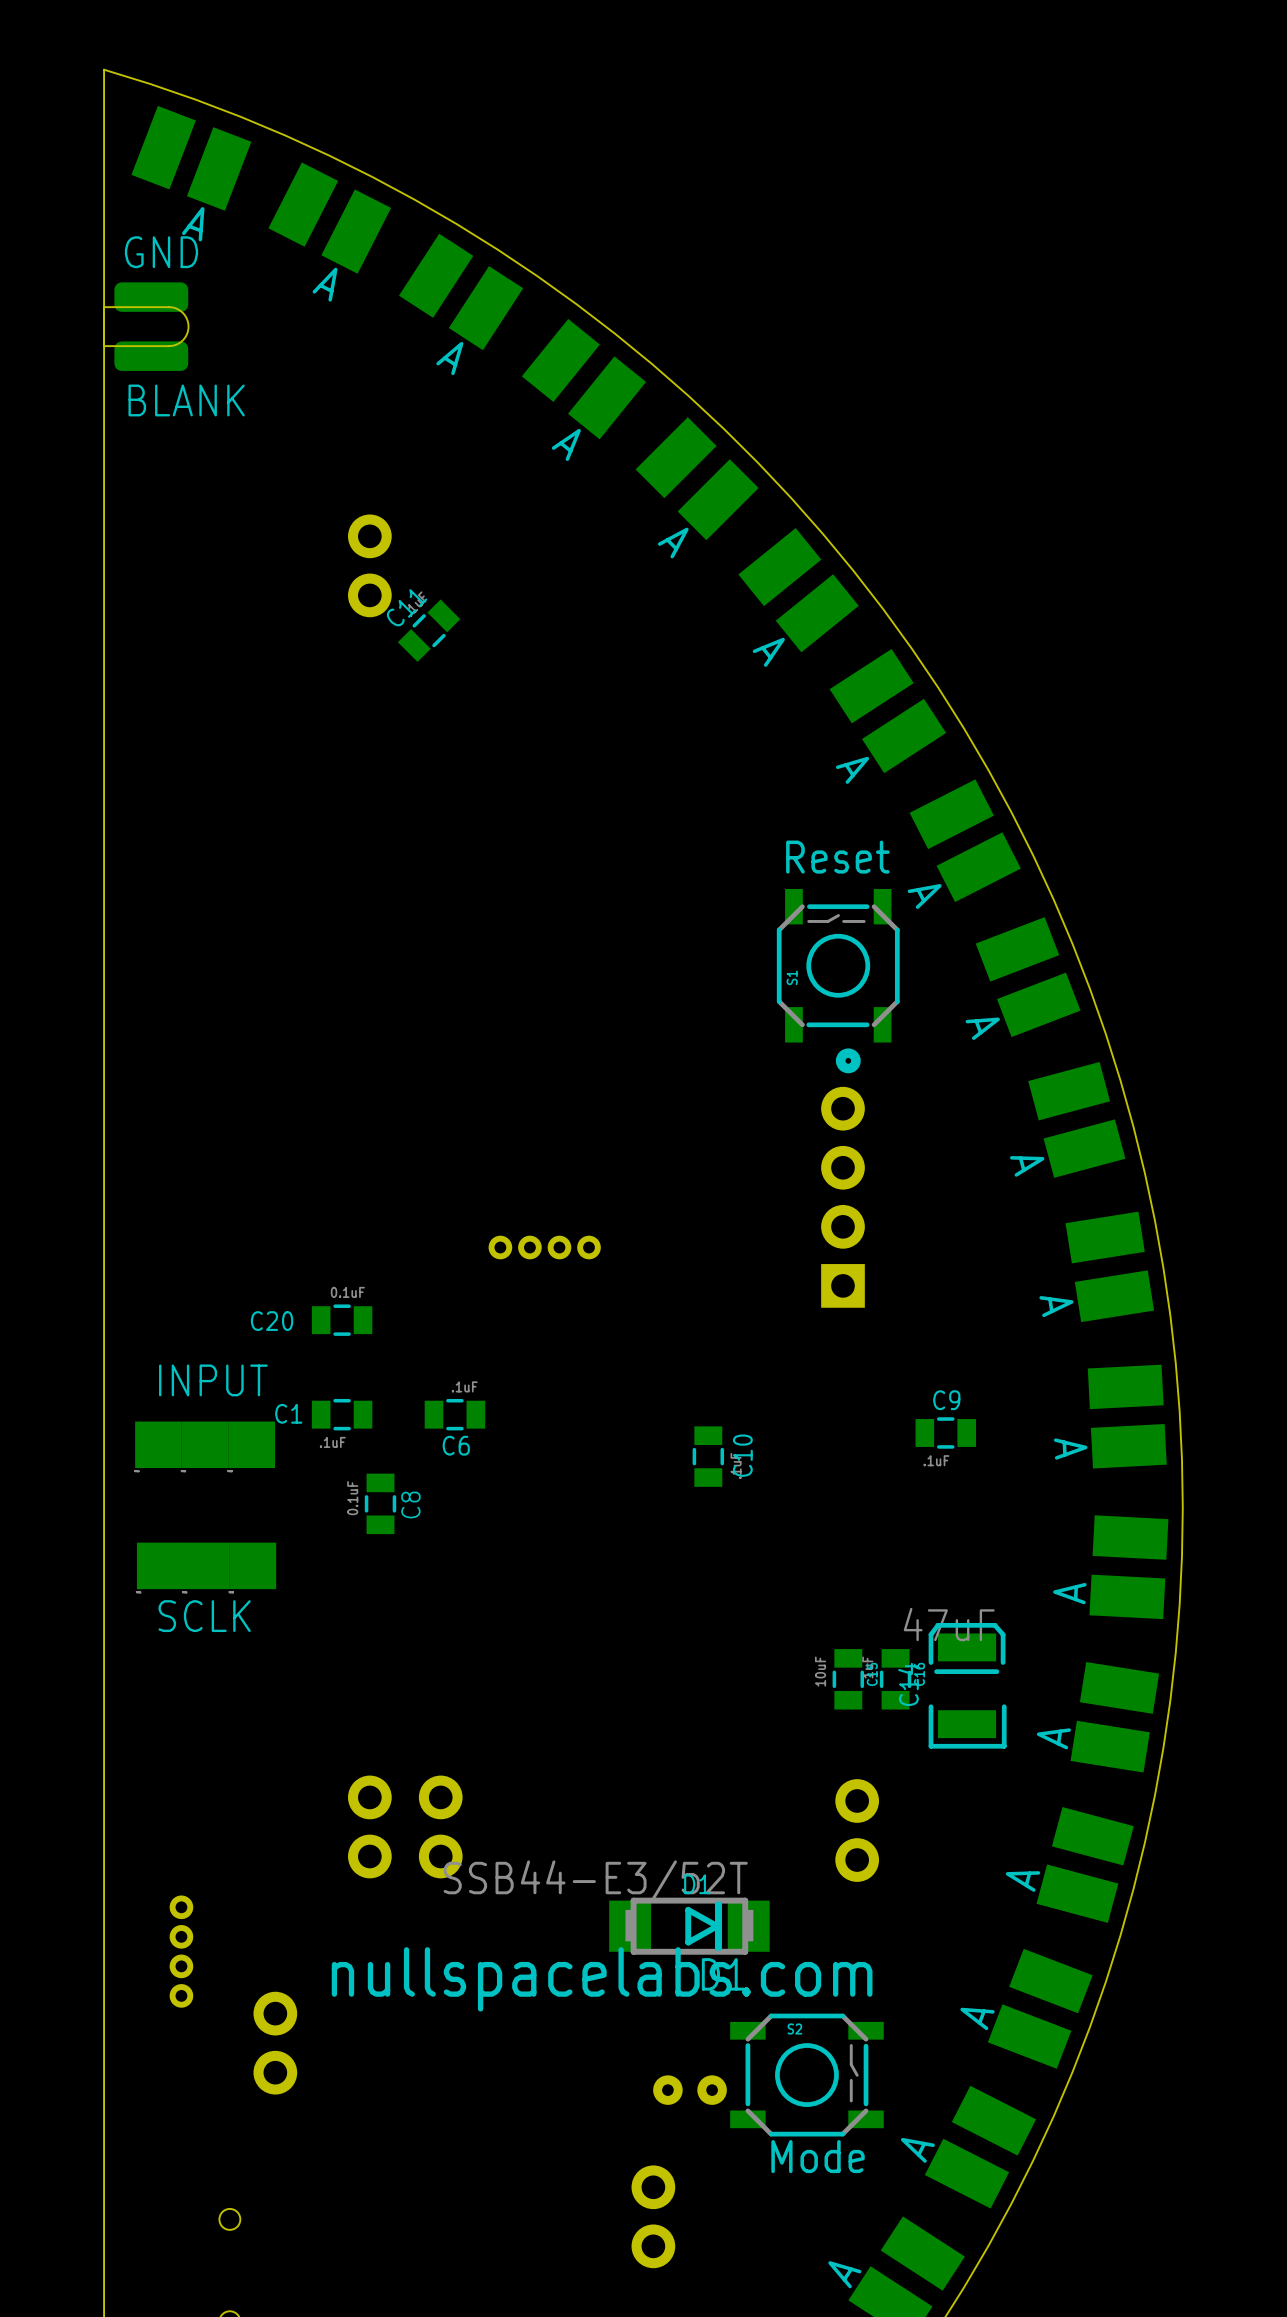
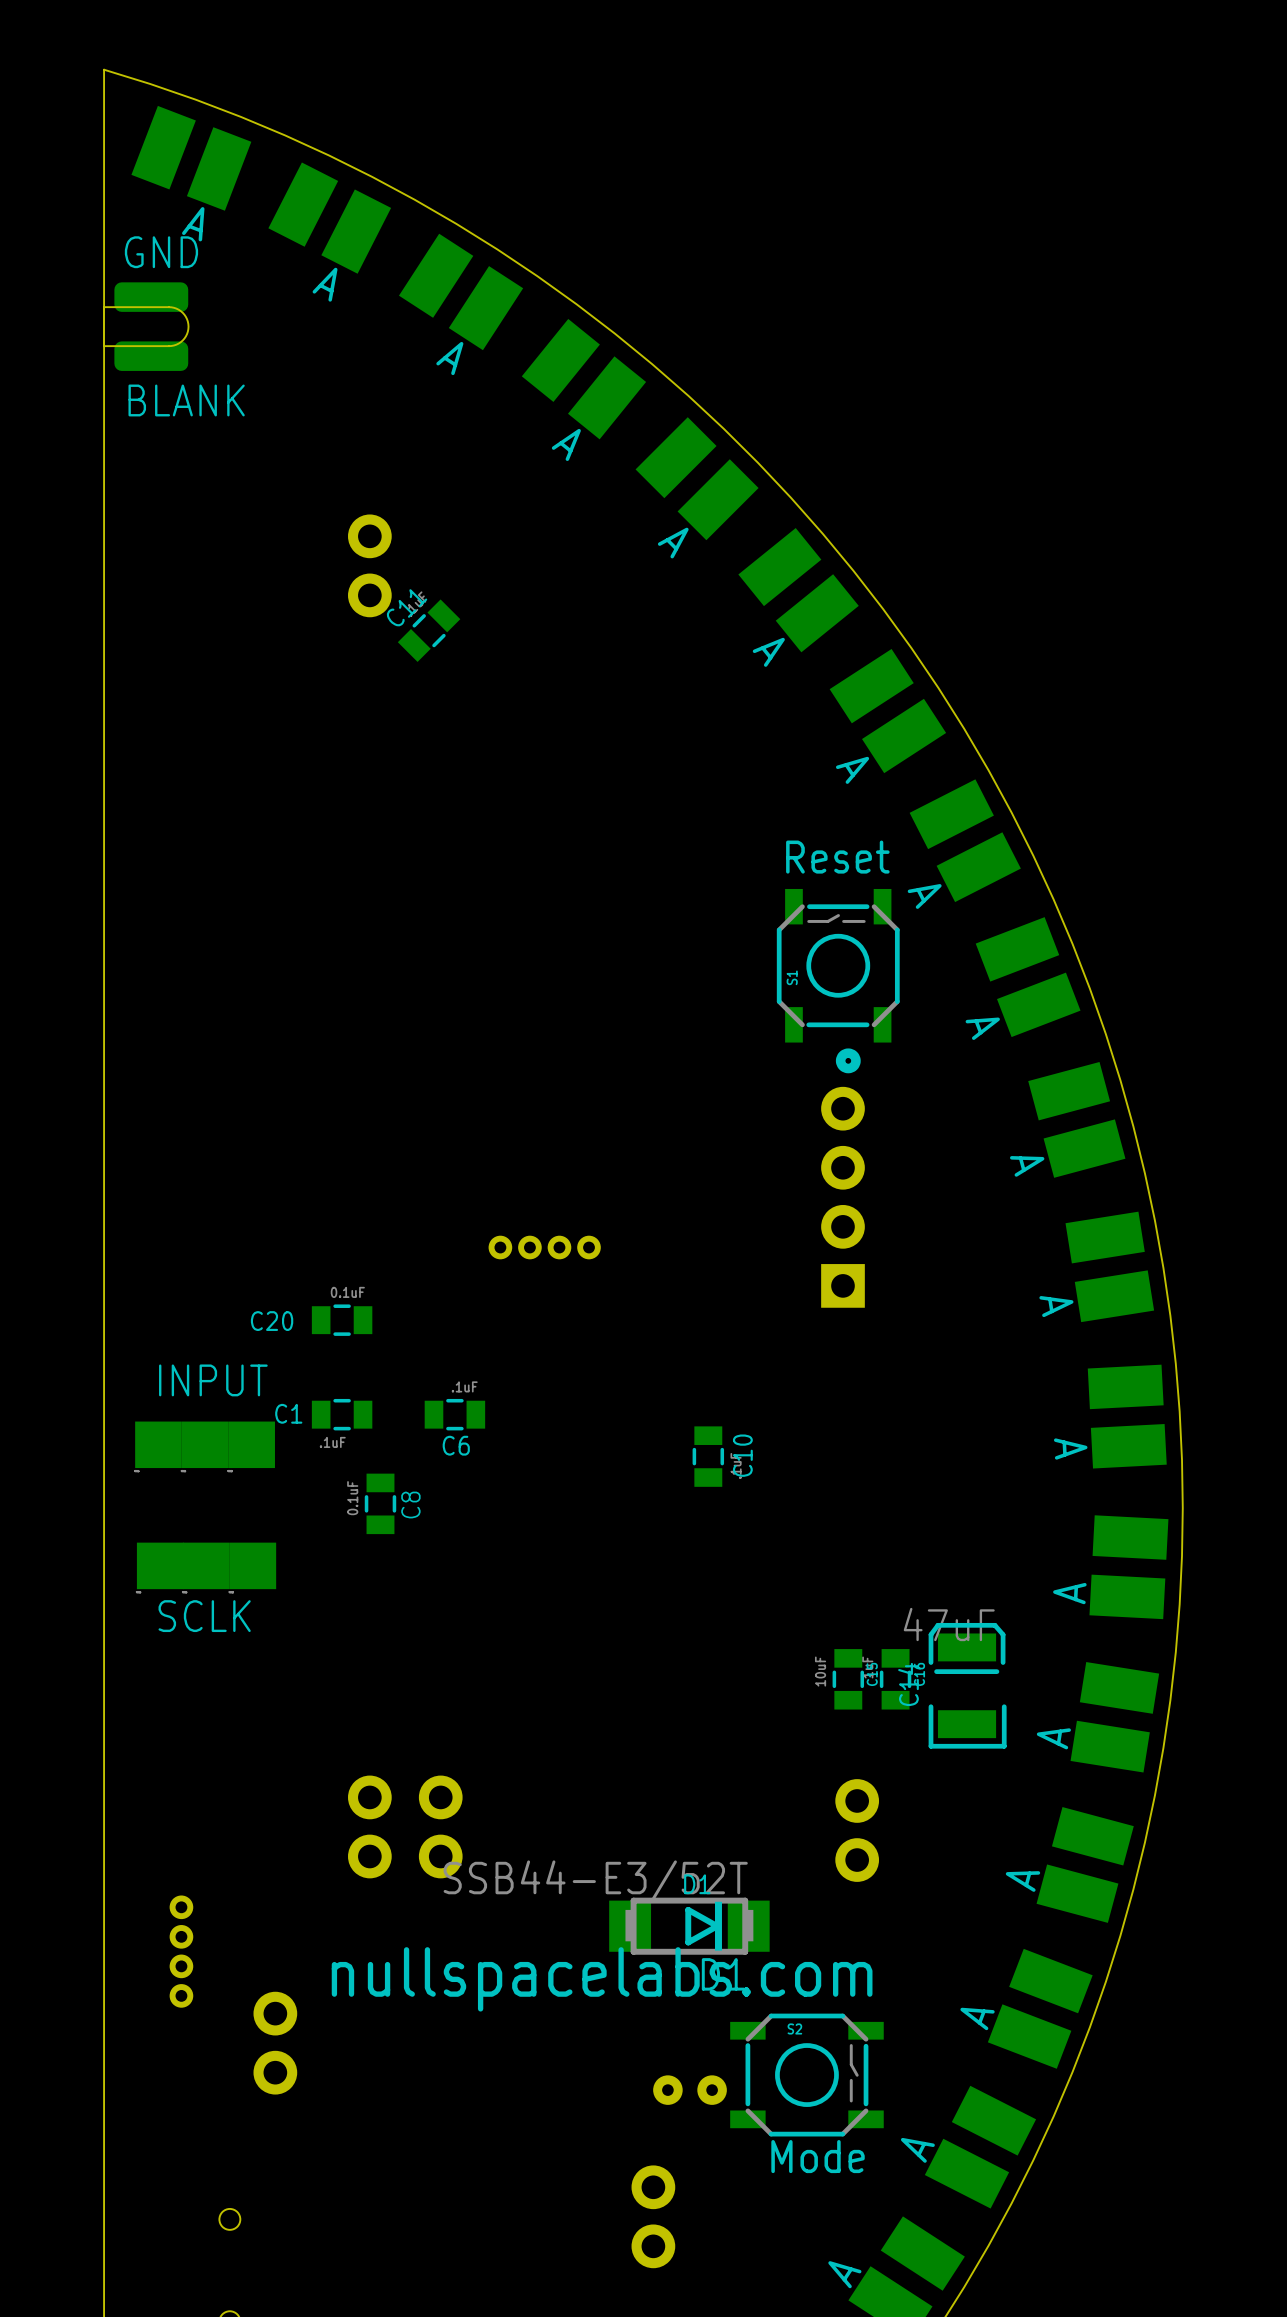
C9: .1uF (945, 1432) -> none

